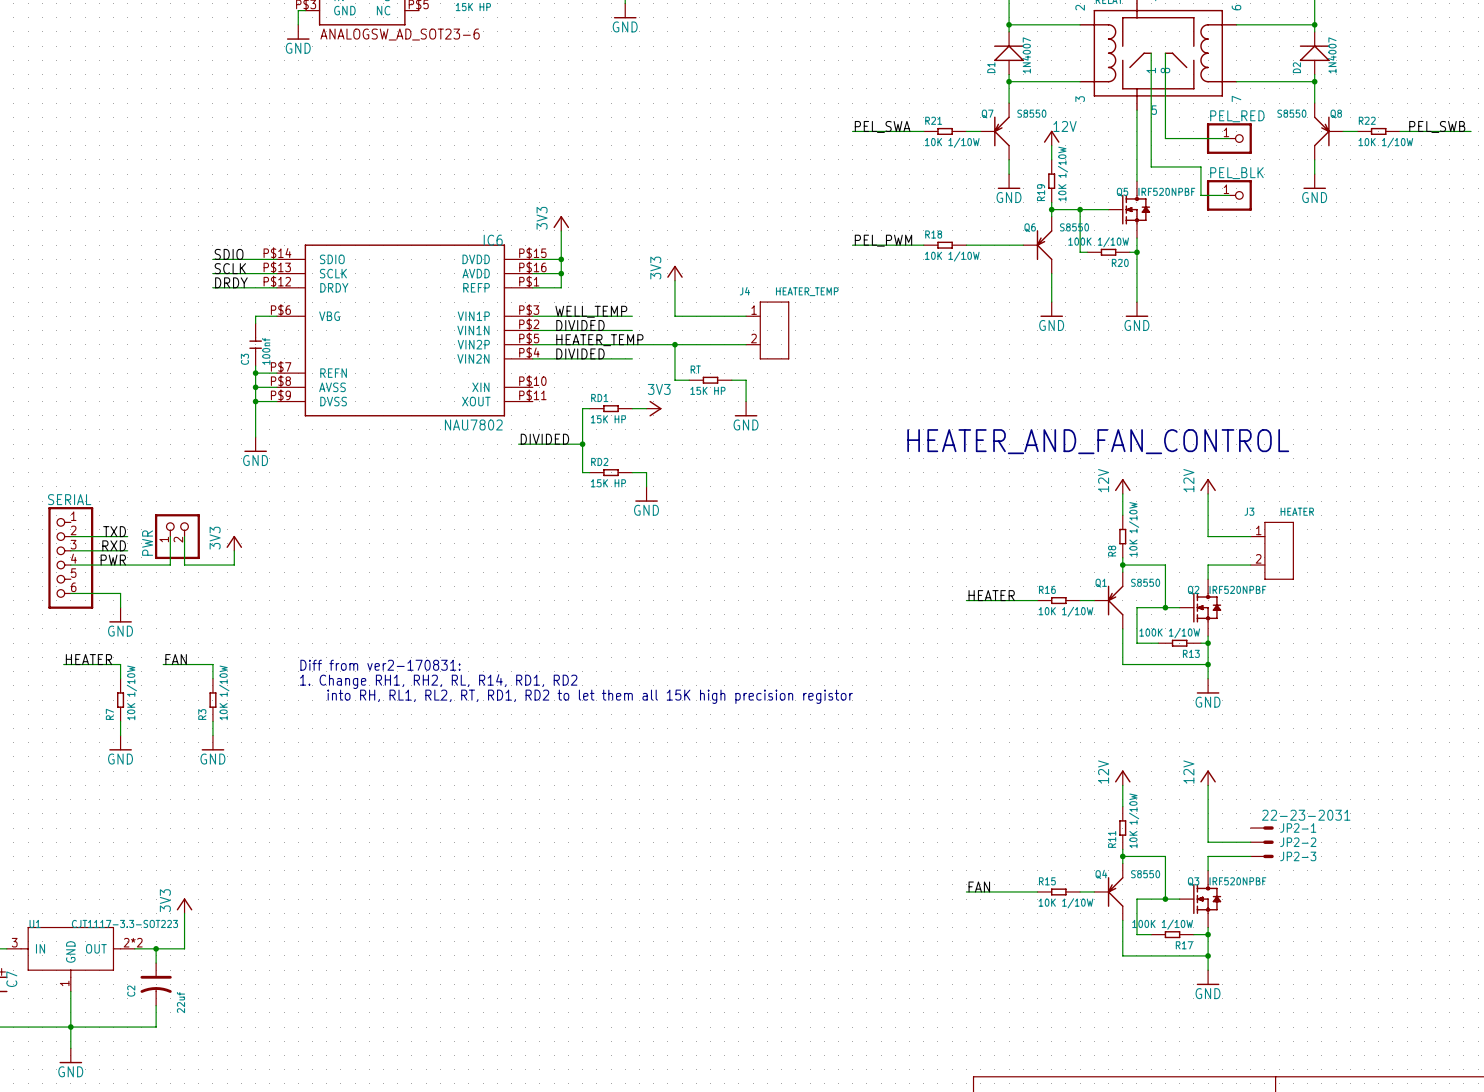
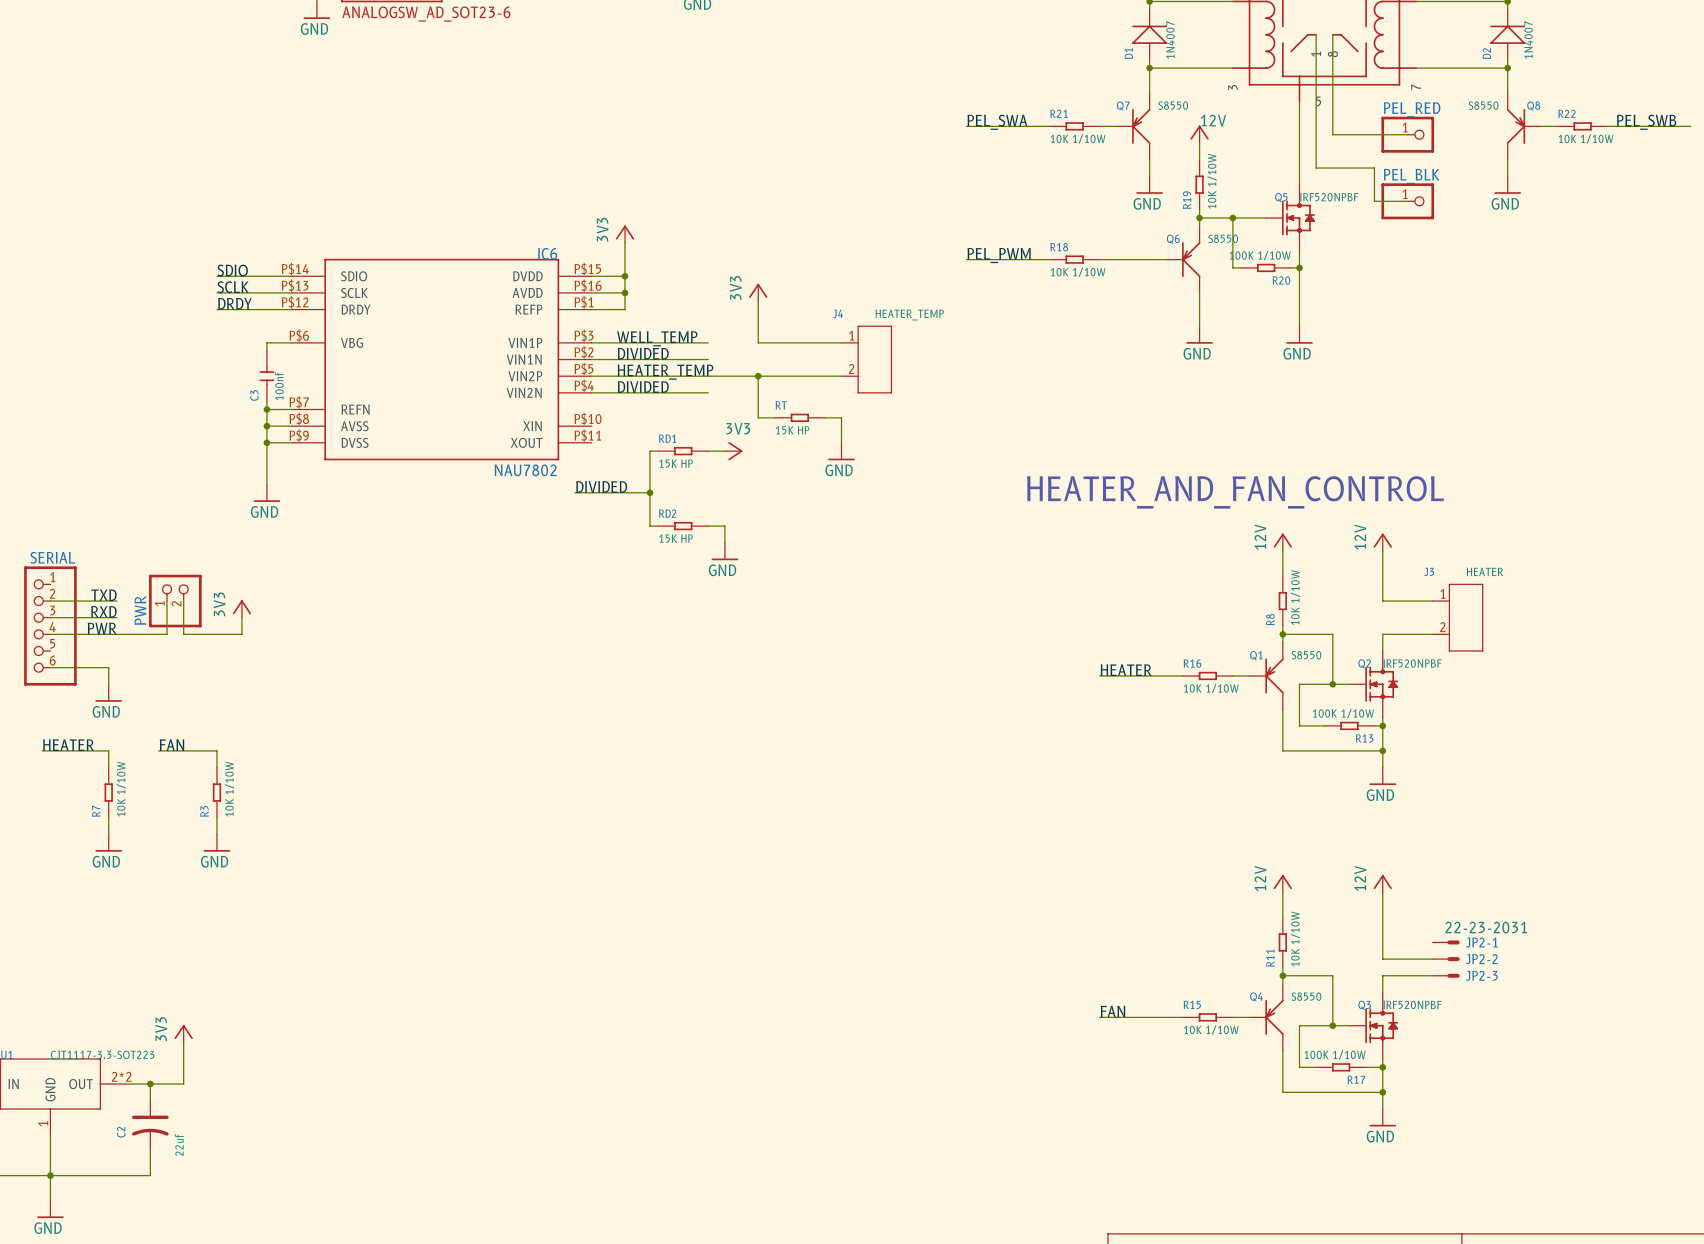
text: Diff from ver2-170831: (380, 665) -> none
text: 1. Change RH1, RH2, RL, R14, RD1, RD2 (438, 681) -> none
text: into RH, RL1, RL2, RT, RD1, RD2 to let them all 15K high precision registor (590, 696) -> none

